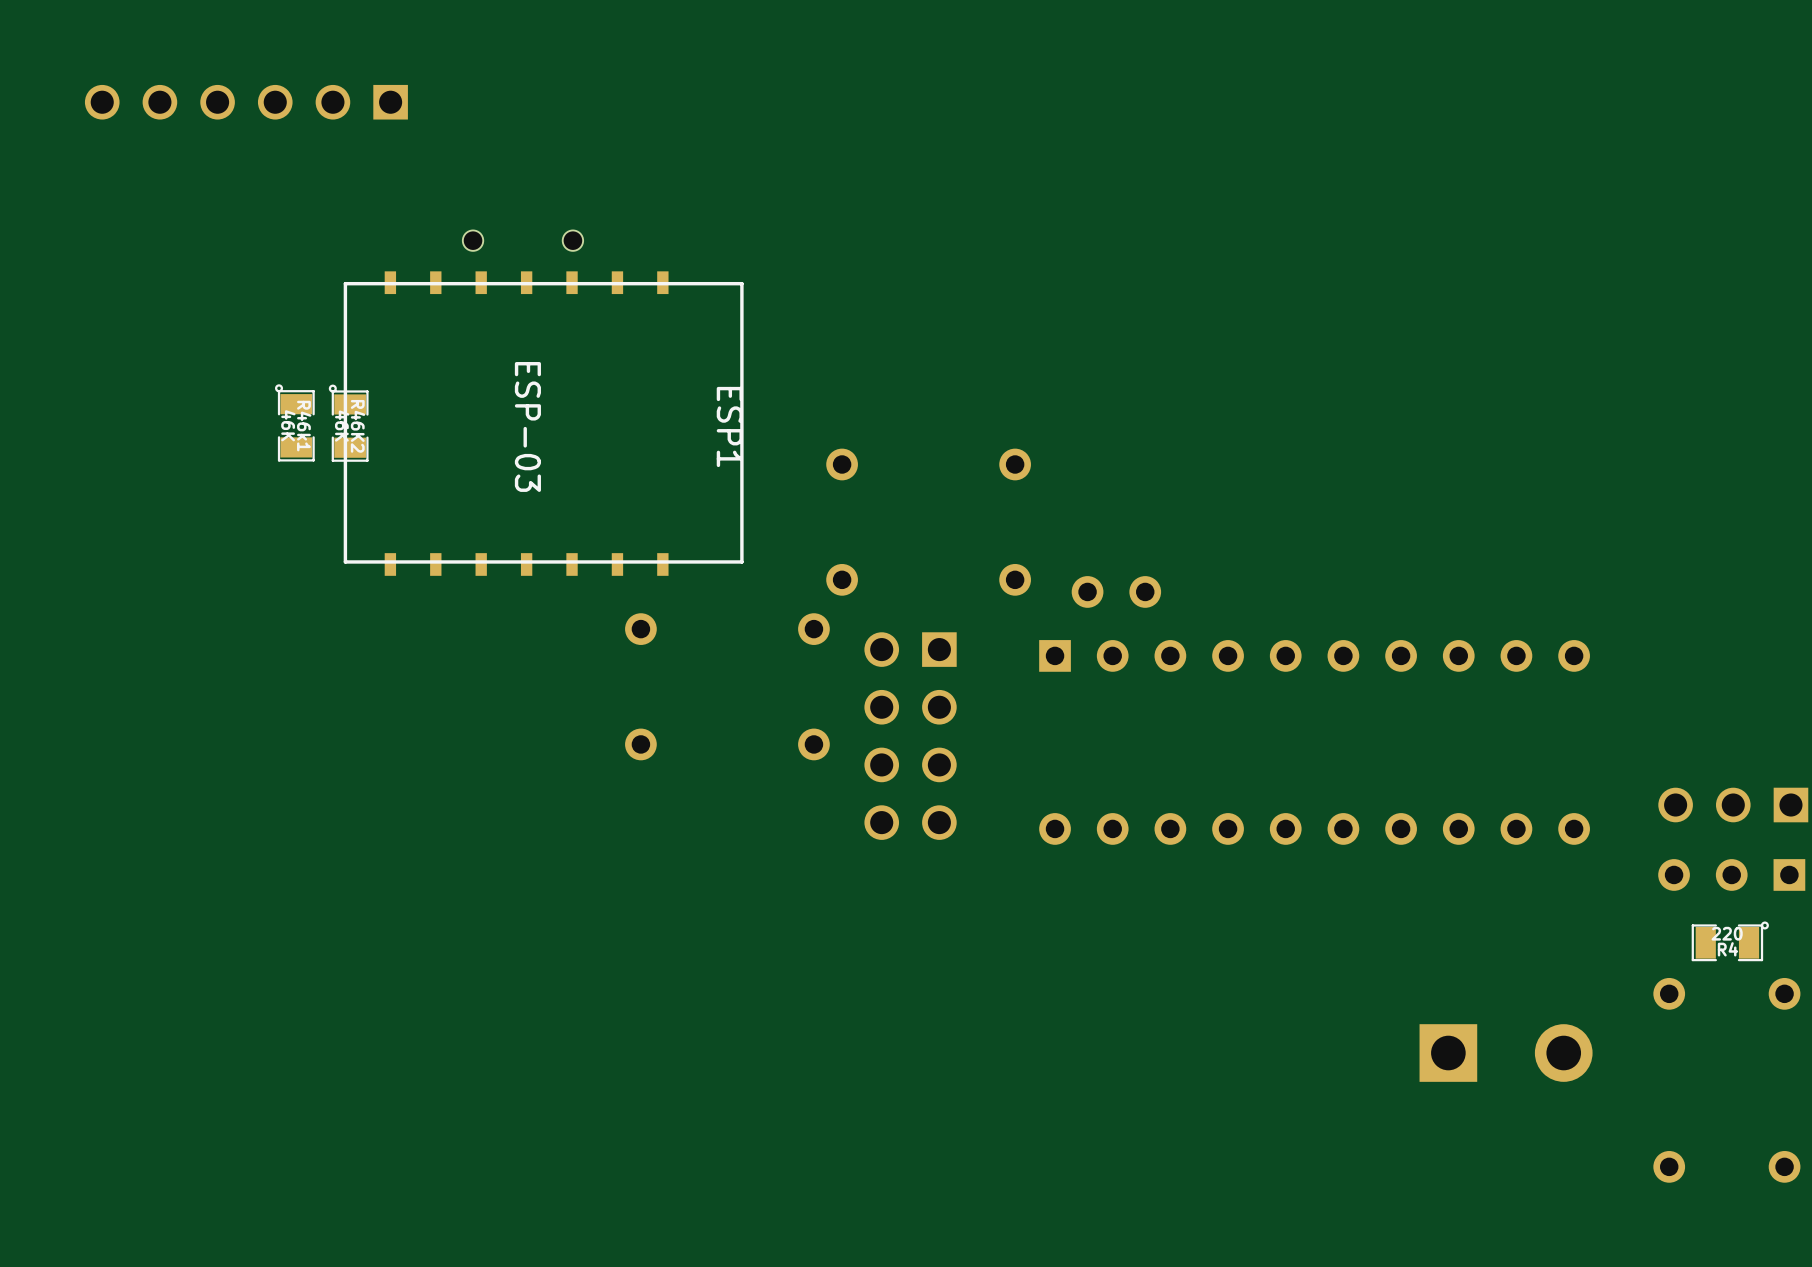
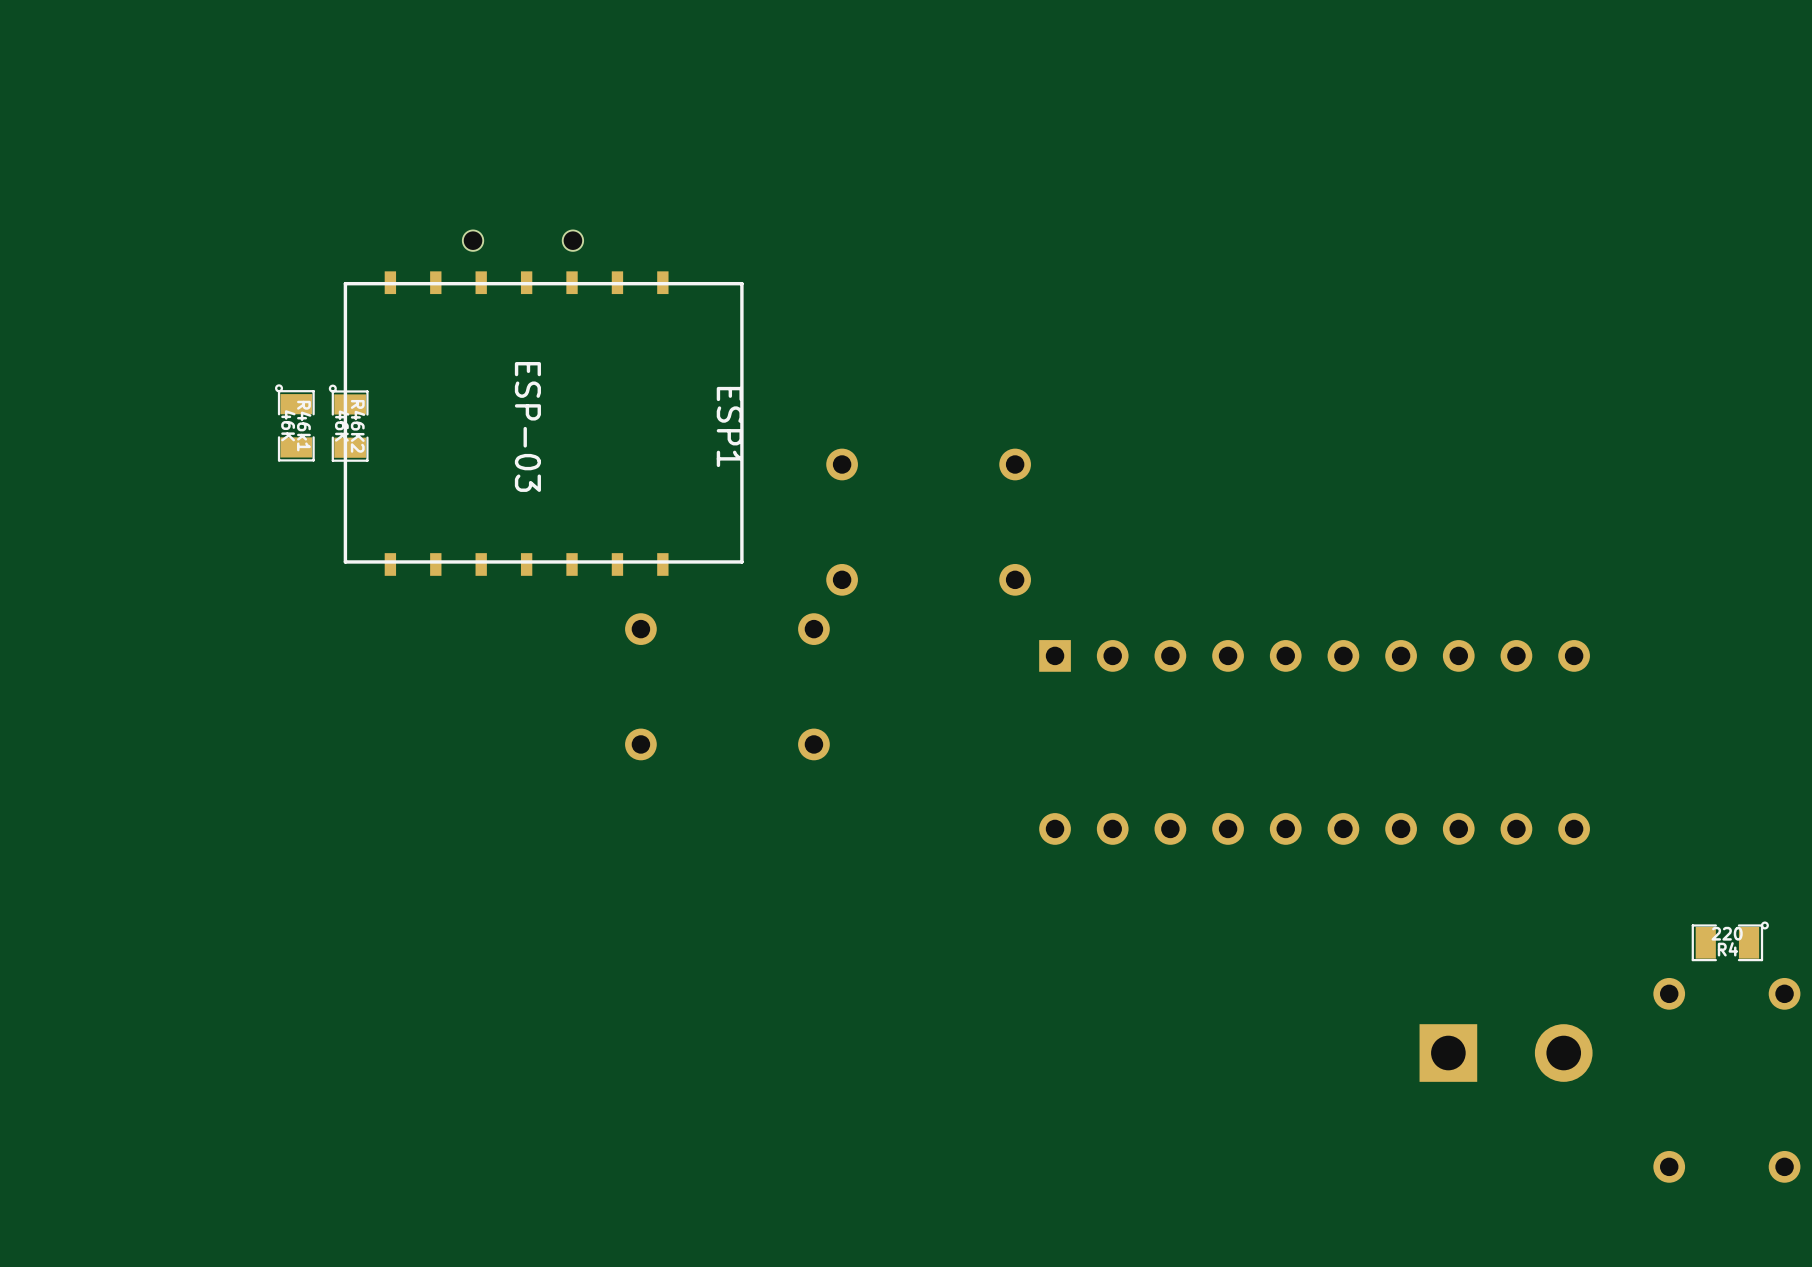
part: (246, 102) -> none
part: (1116, 591) -> none
part: (910, 736) -> none
part: (1733, 805) -> none
part: (1731, 874) -> none

